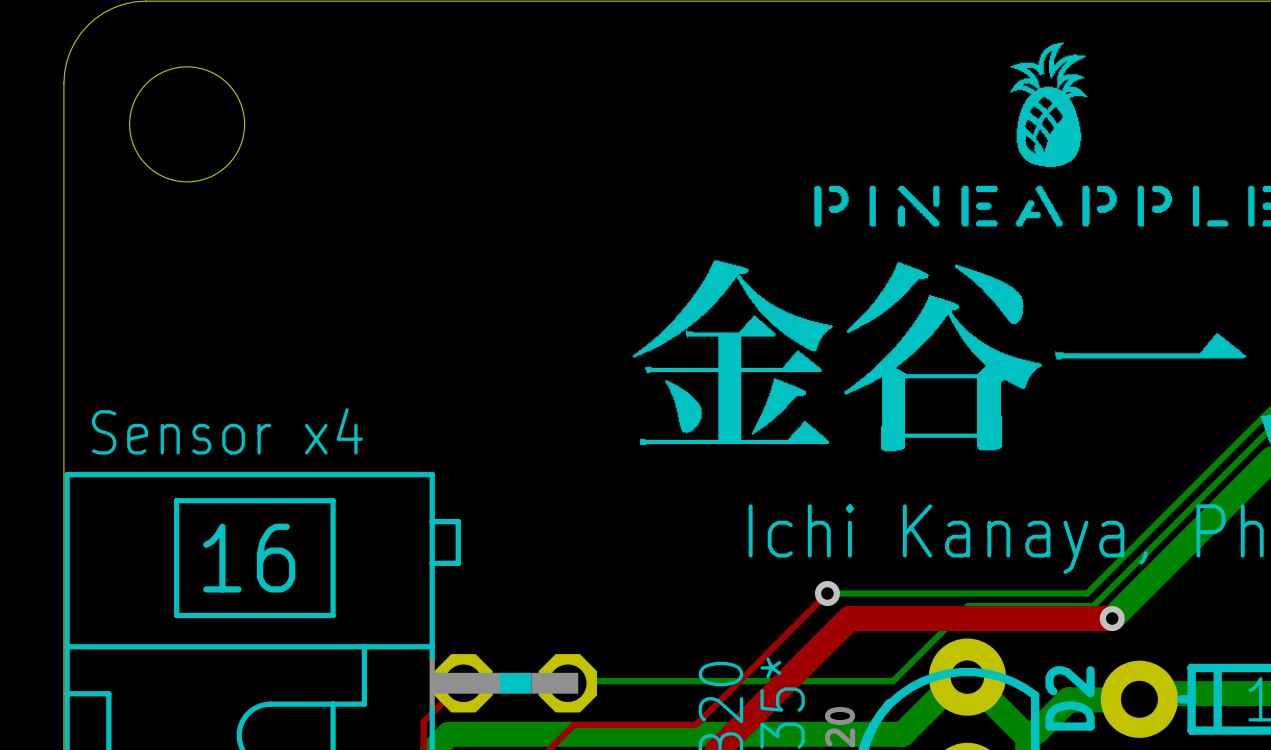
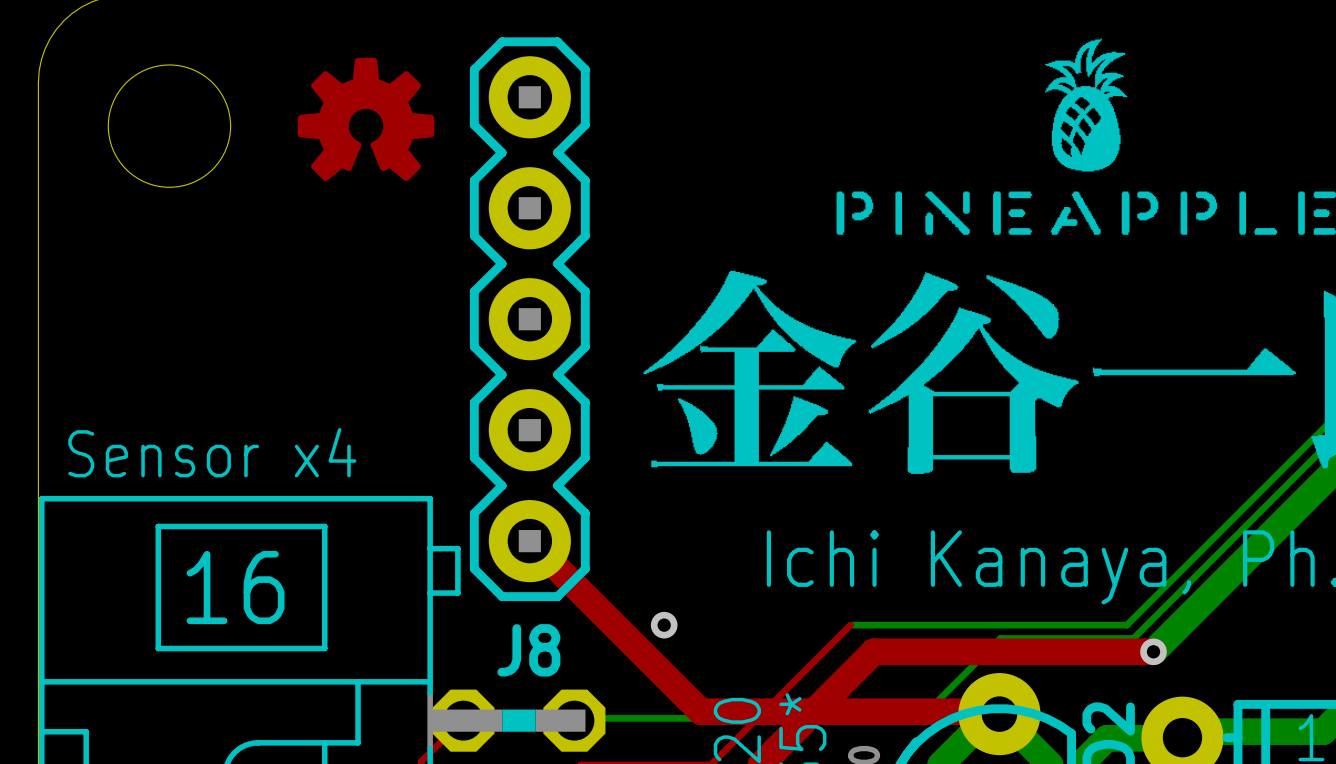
drawing: none -> [297, 57, 435, 182]
J8: none -> (529, 319)
top track: none -> (529, 541) (700, 711) (997, 711) (999, 714)
via position: (827, 593) -> (664, 625)

